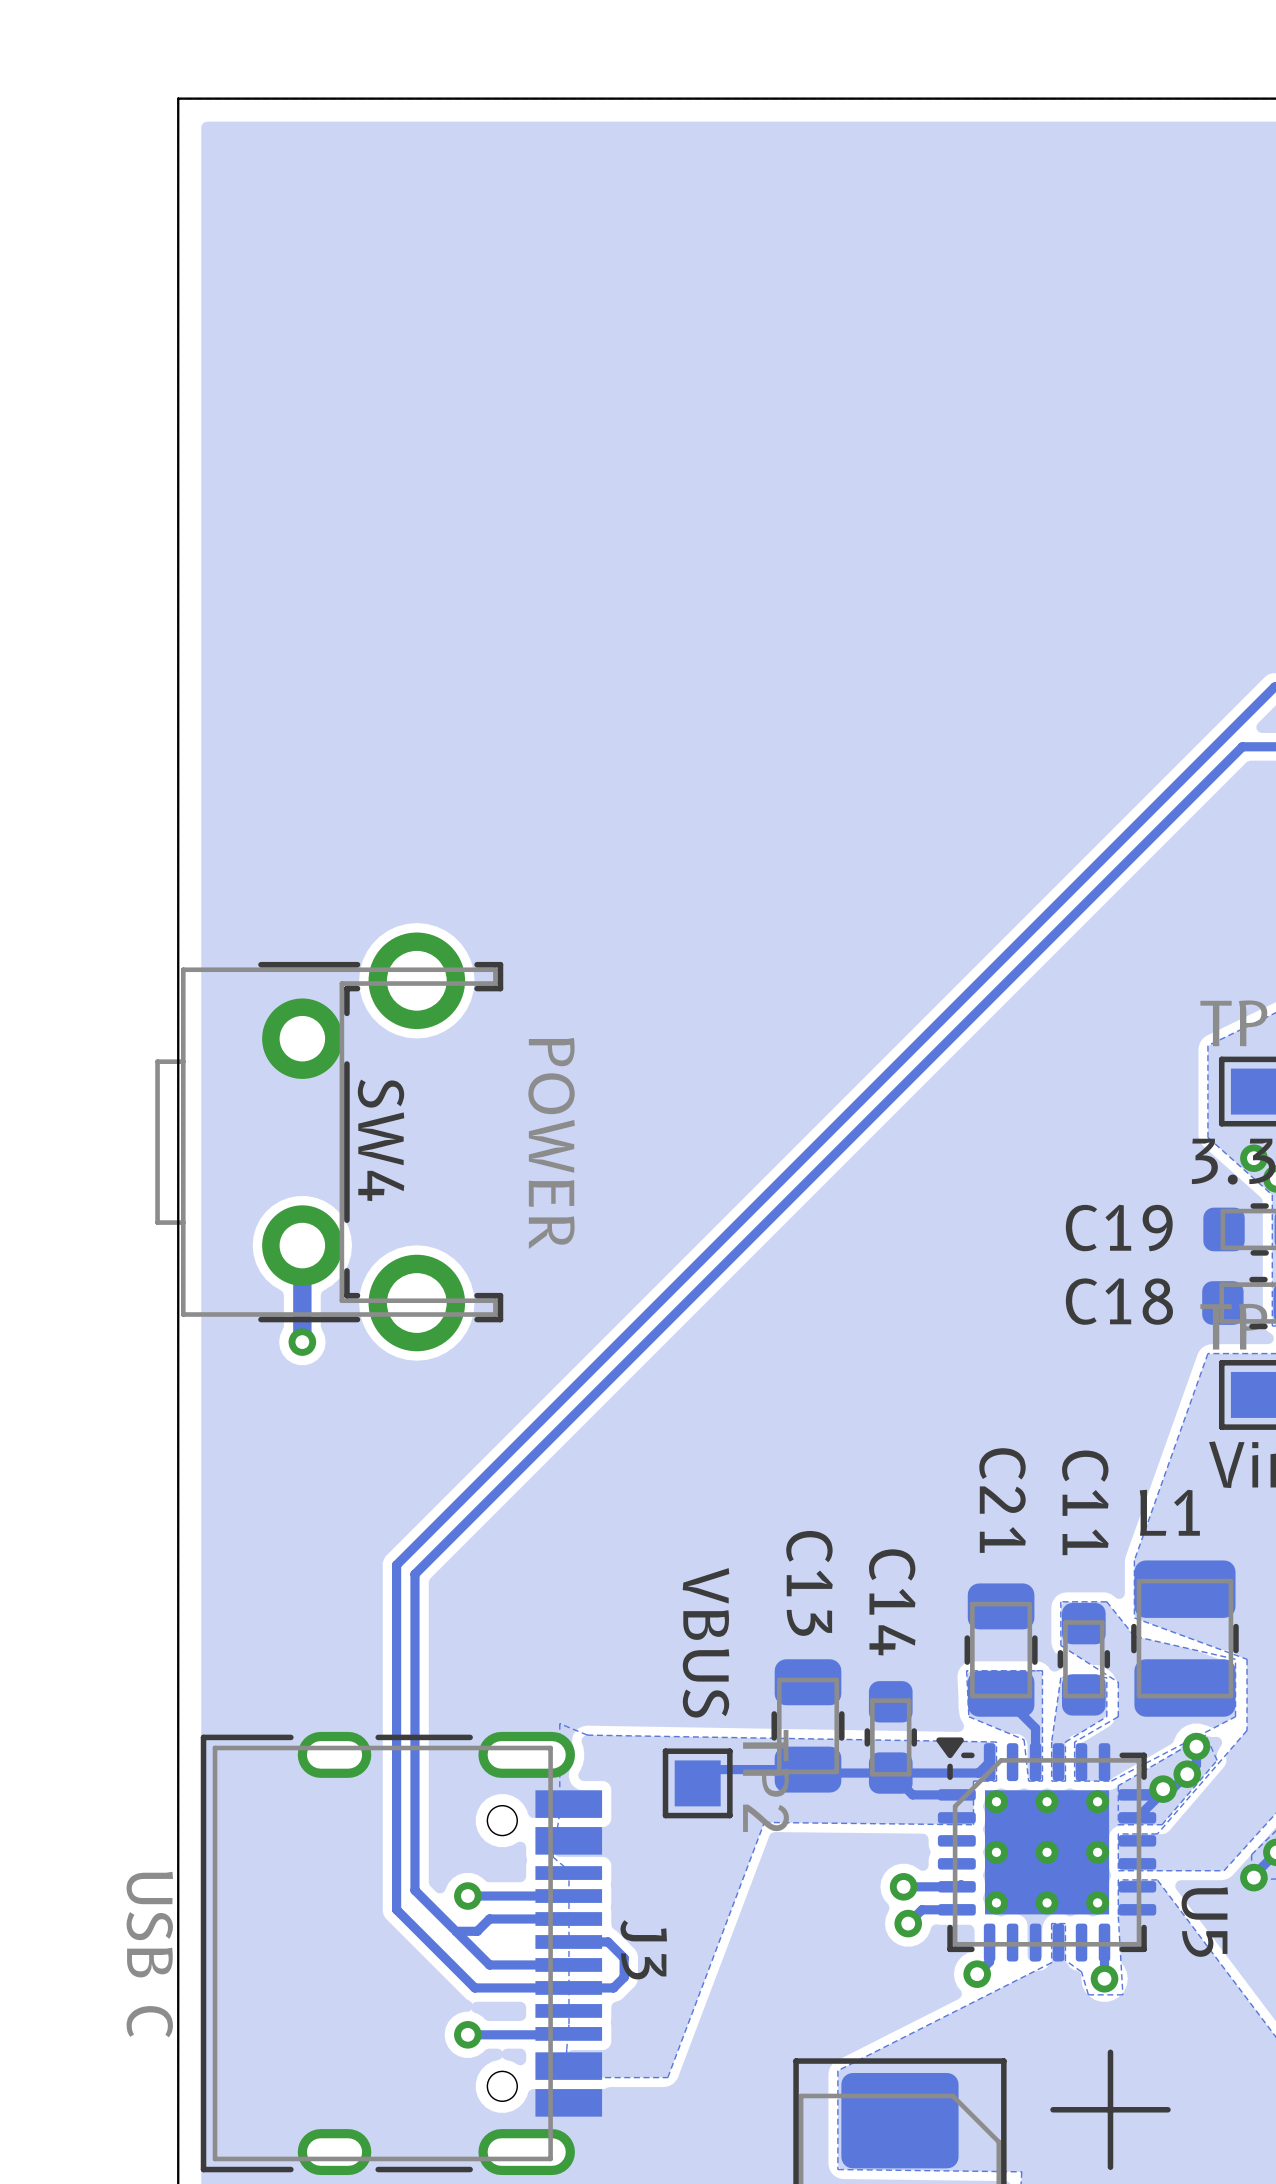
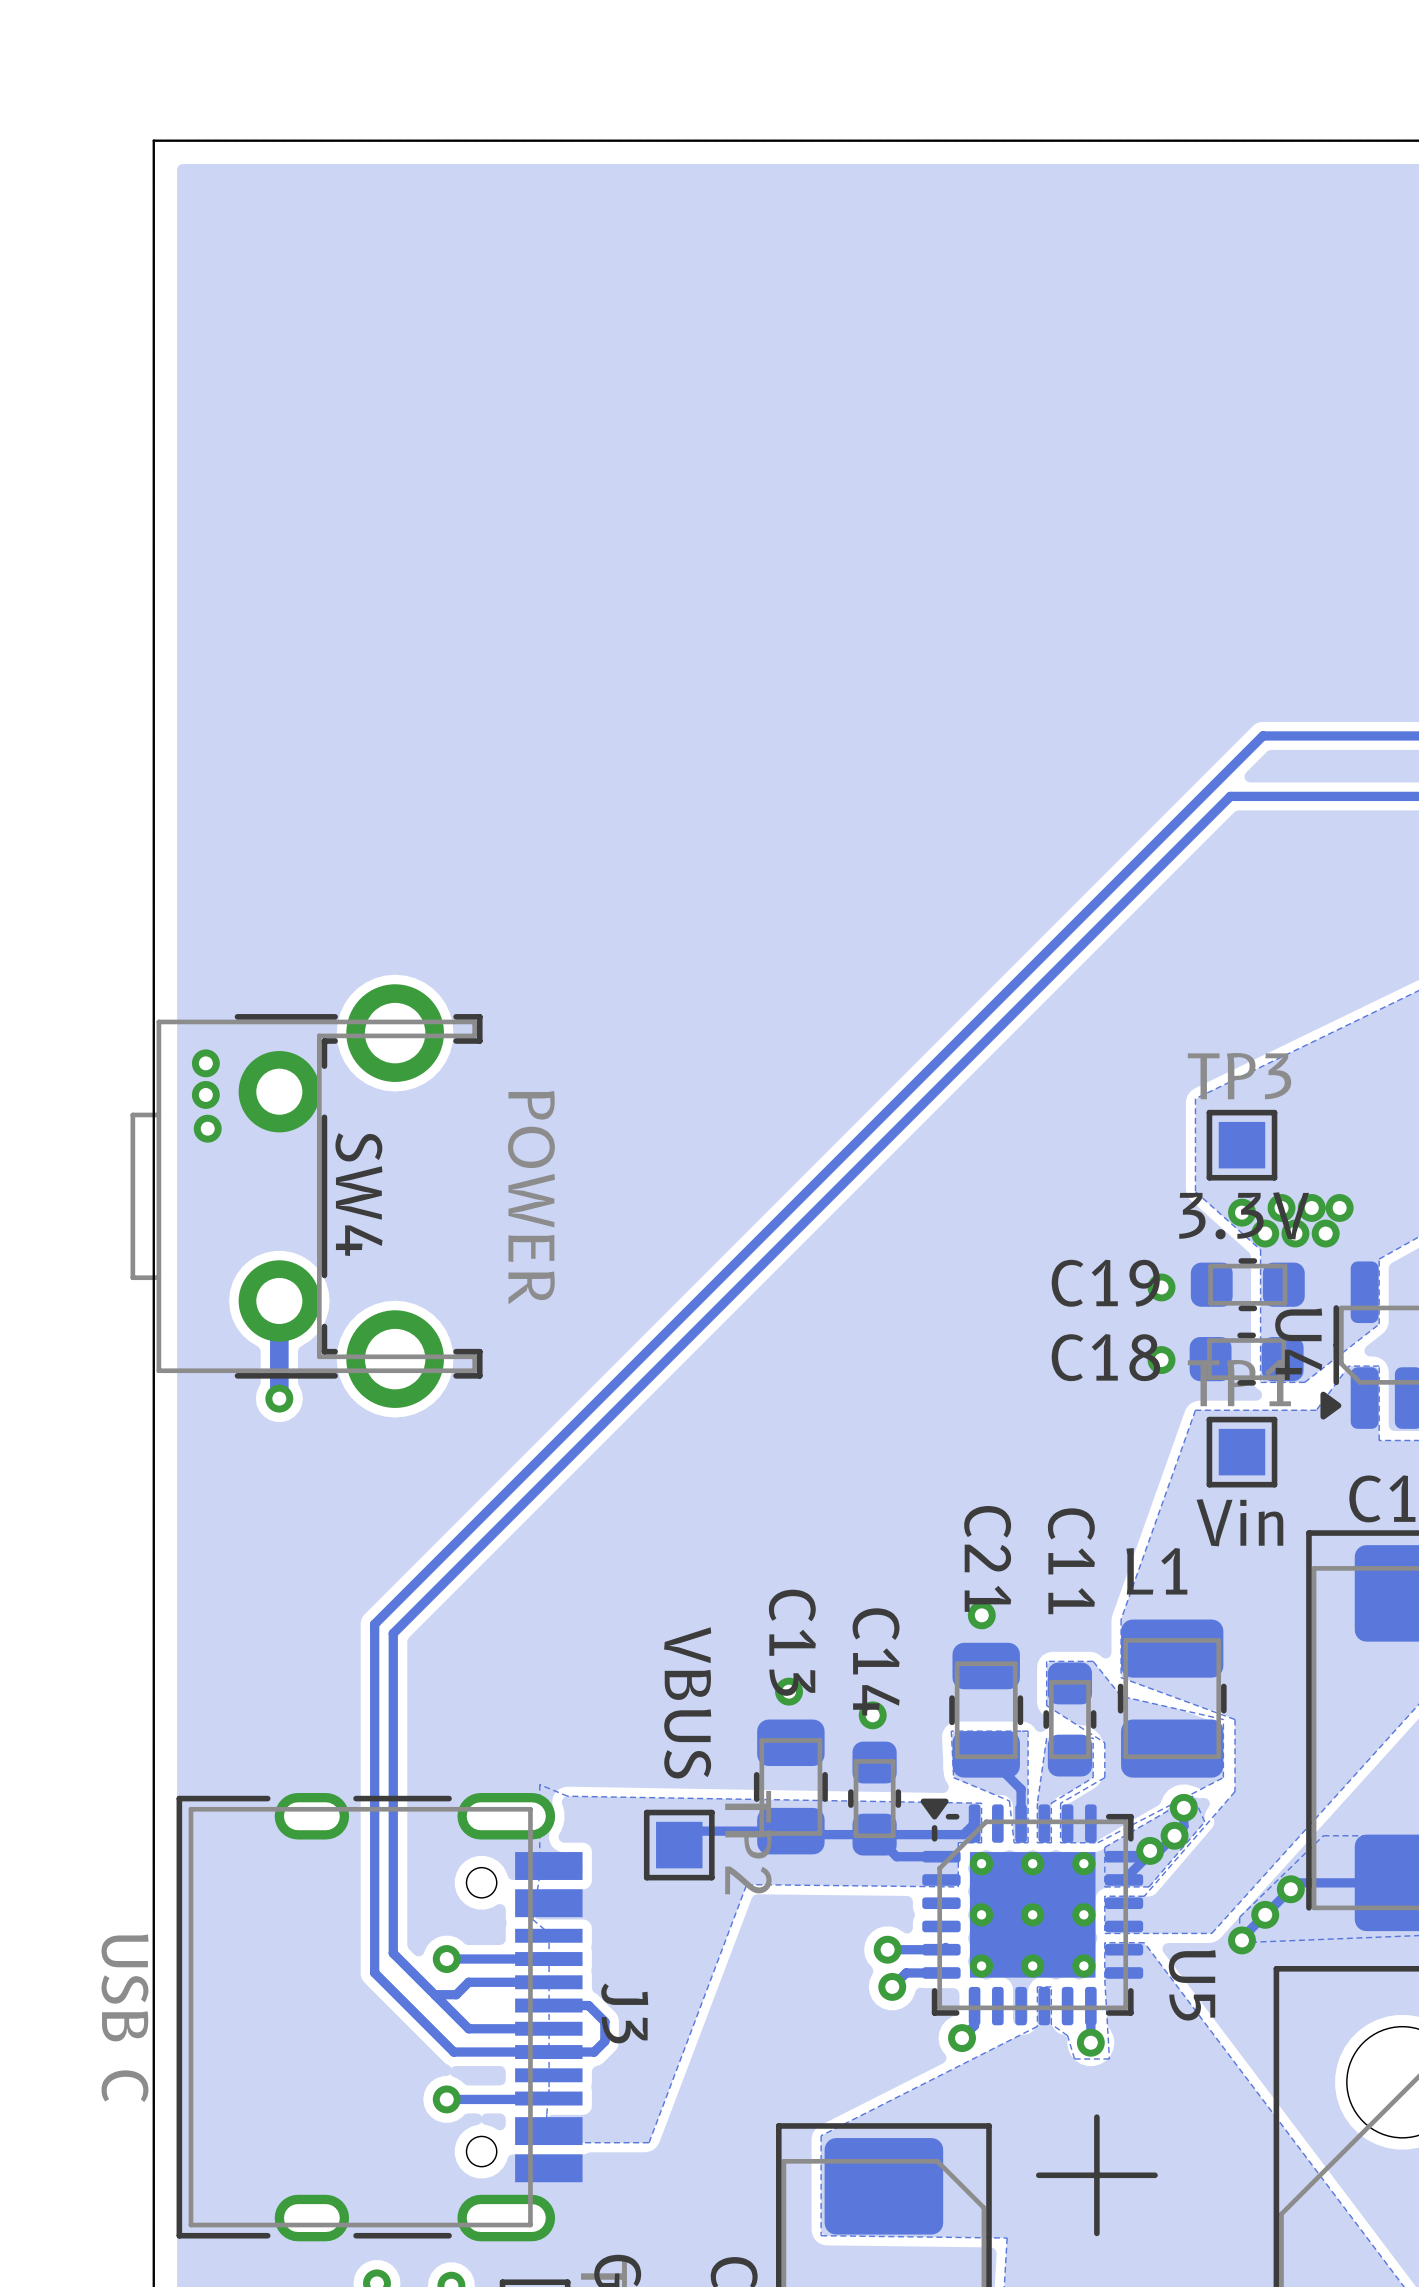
via: none -> (205, 1063)
via: none -> (205, 1094)
via: none -> (207, 1128)
via: none -> (1161, 1287)
via: none -> (1161, 1360)
via: none -> (981, 1615)
via: none -> (789, 1691)
via: none -> (872, 1715)

